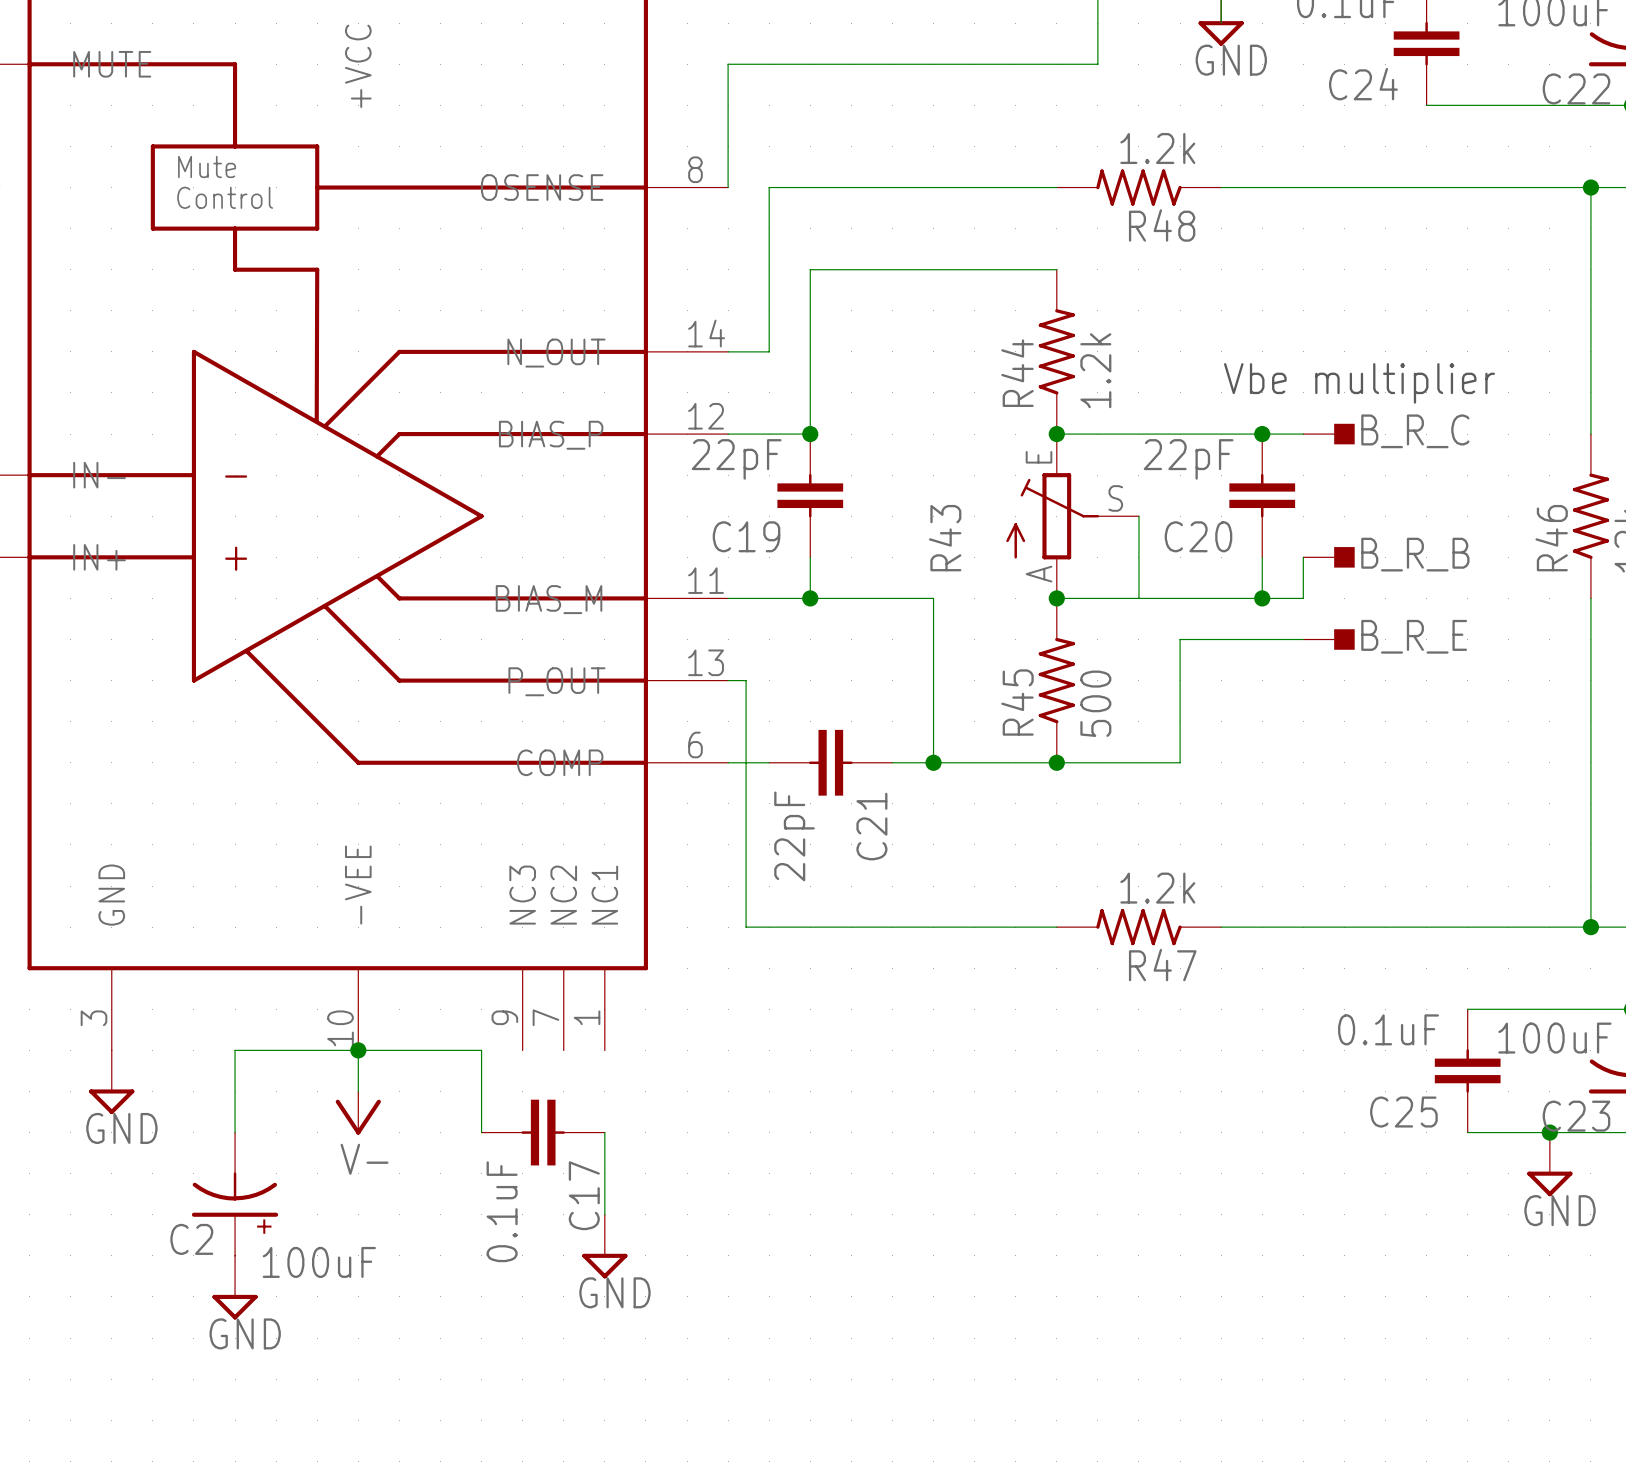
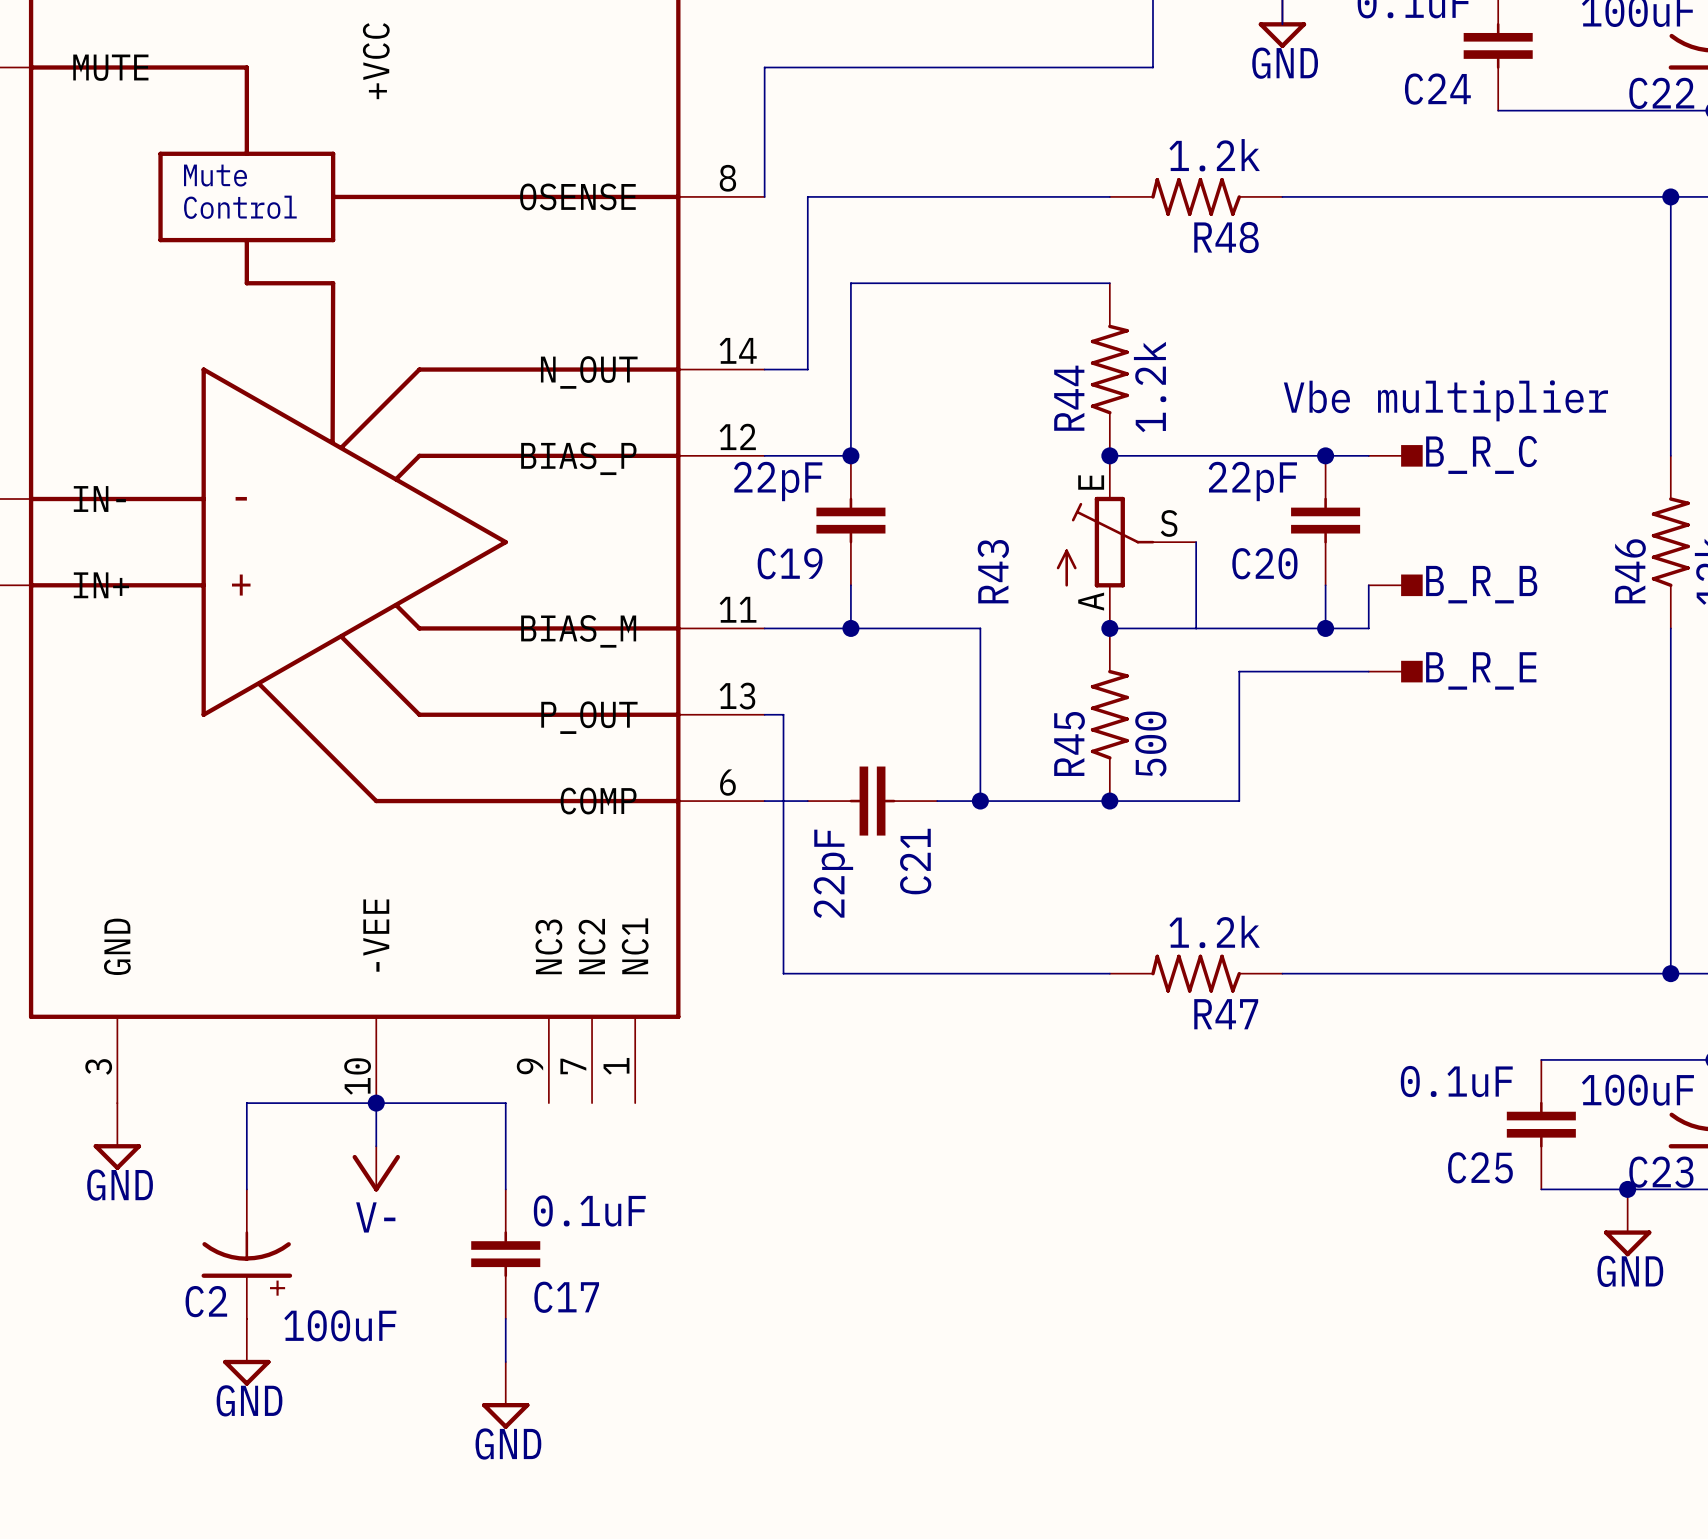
C17 rotation: 0° (543, 1132) -> 90° clockwise (505, 1254)
C17 position: (543, 1132) -> (505, 1254)
wire: (604, 1132) (604, 1214) -> none
C17 name position: C17 (584, 1195) -> C17 (566, 1297)
C17 value position: 0.1uF (502, 1211) -> 0.1uF (589, 1210)
power symbol position: GND (604, 1246) -> GND (505, 1395)
wire: none -> (505, 1318) (505, 1362)

